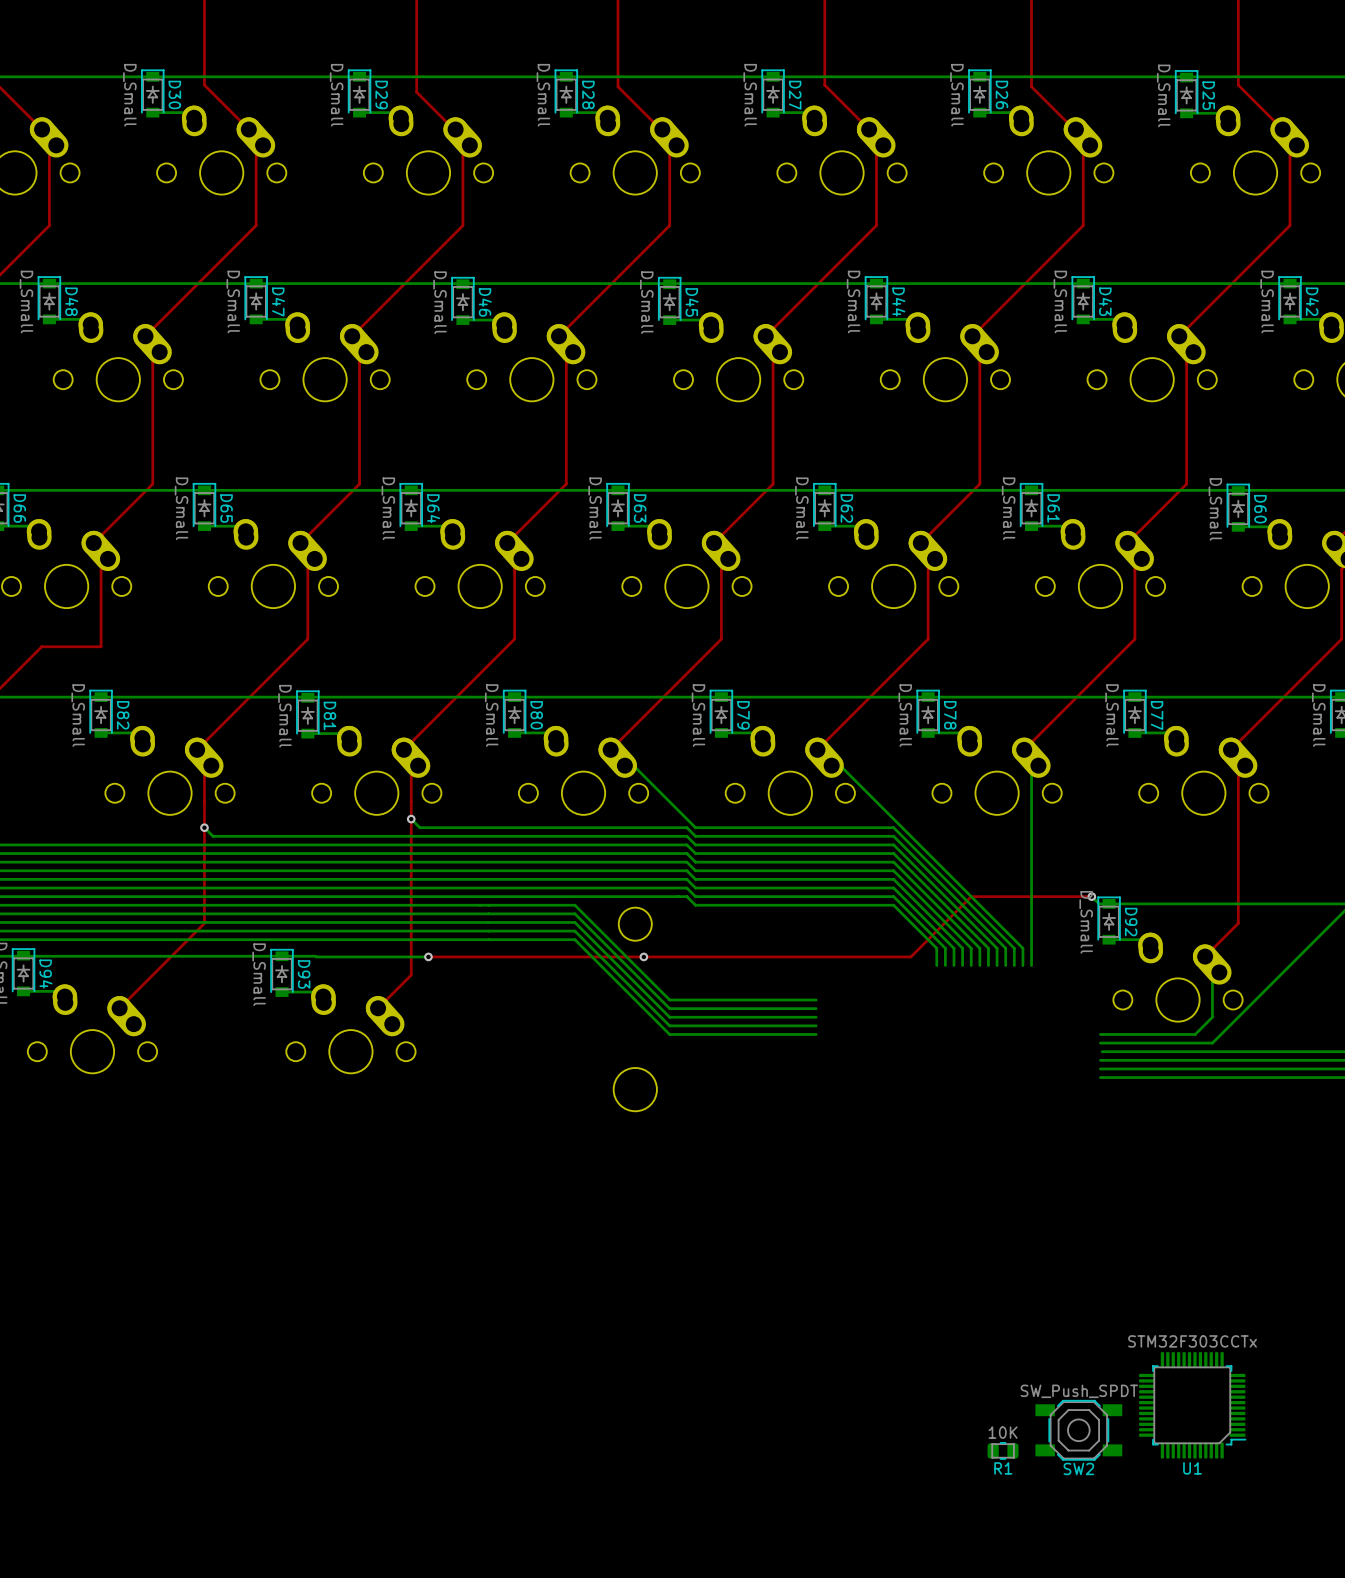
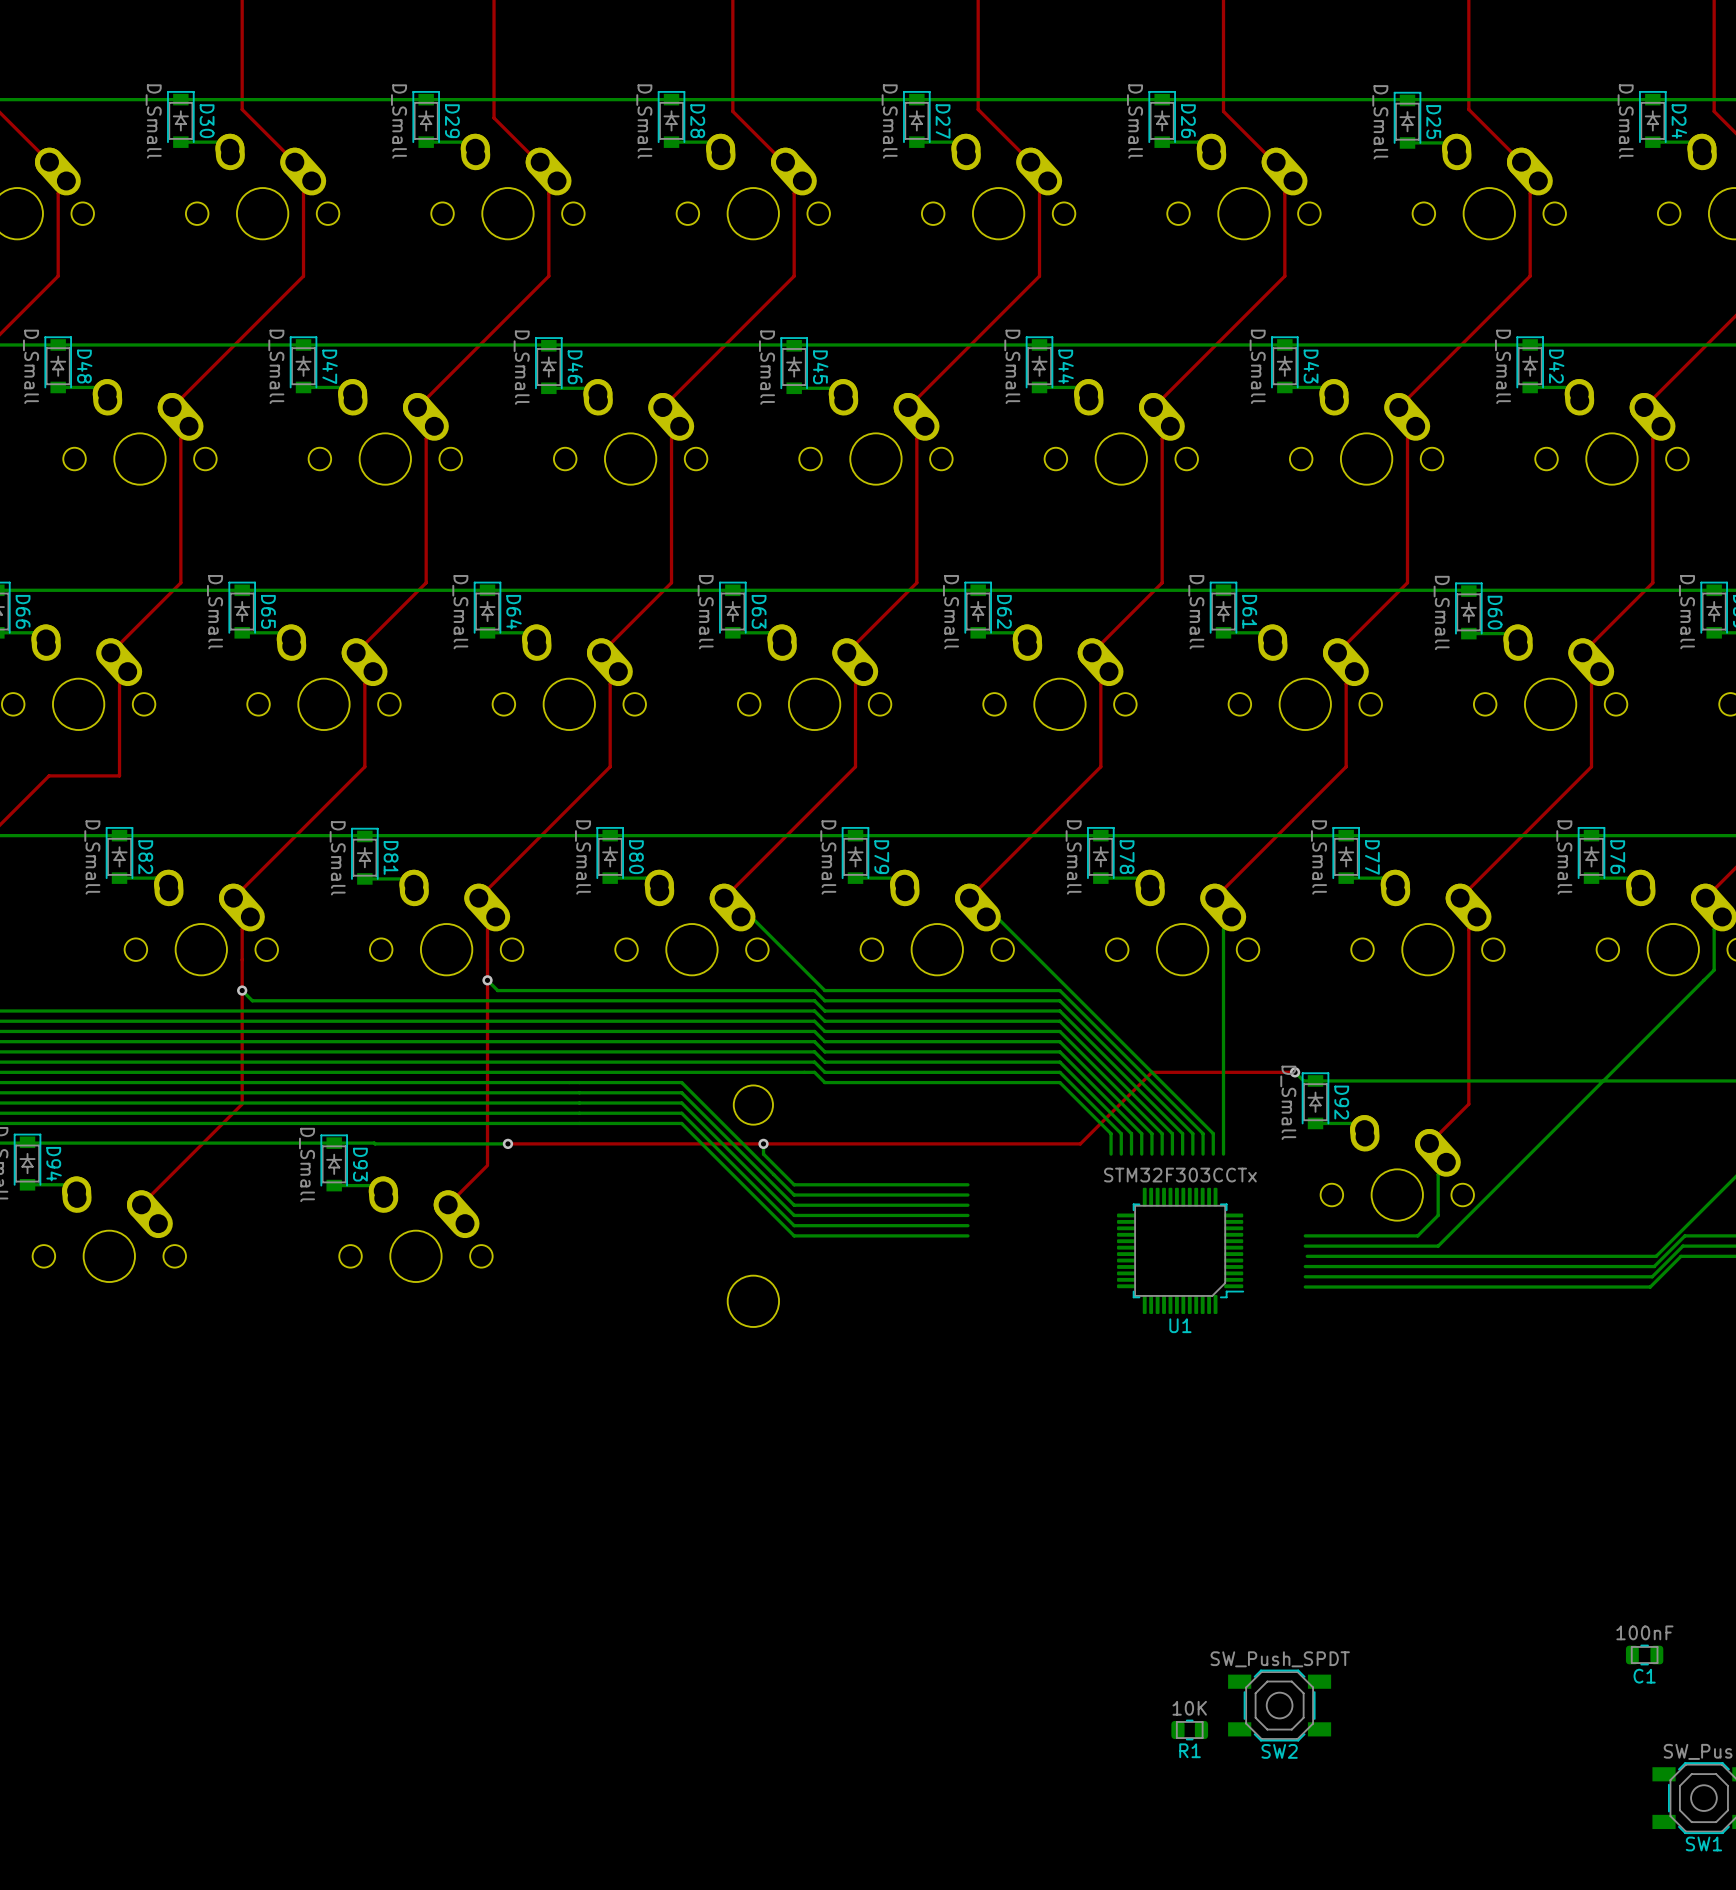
bottom track: none -> (763, 1143) (763, 1154) (794, 1184) (967, 1184)
U1 position: (1192, 1405) -> (1180, 1250)

